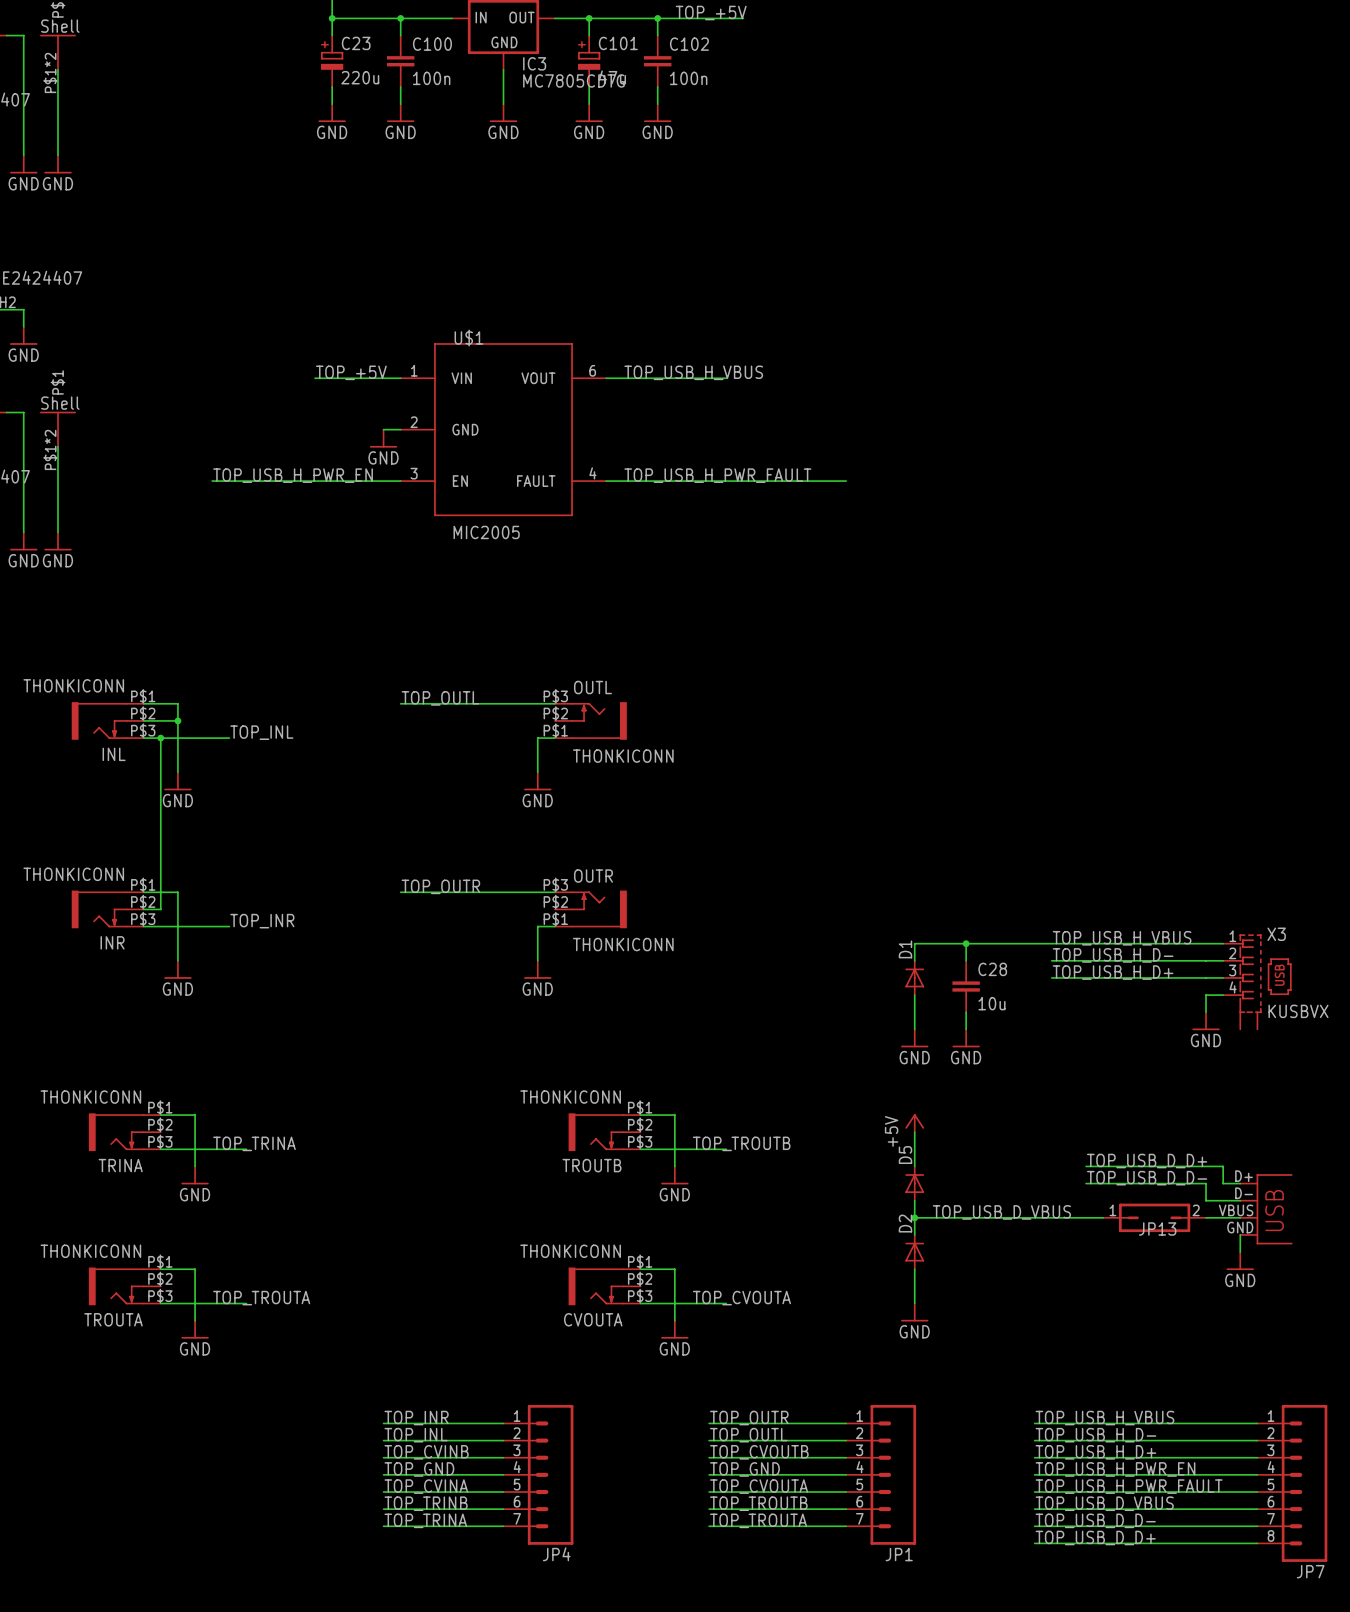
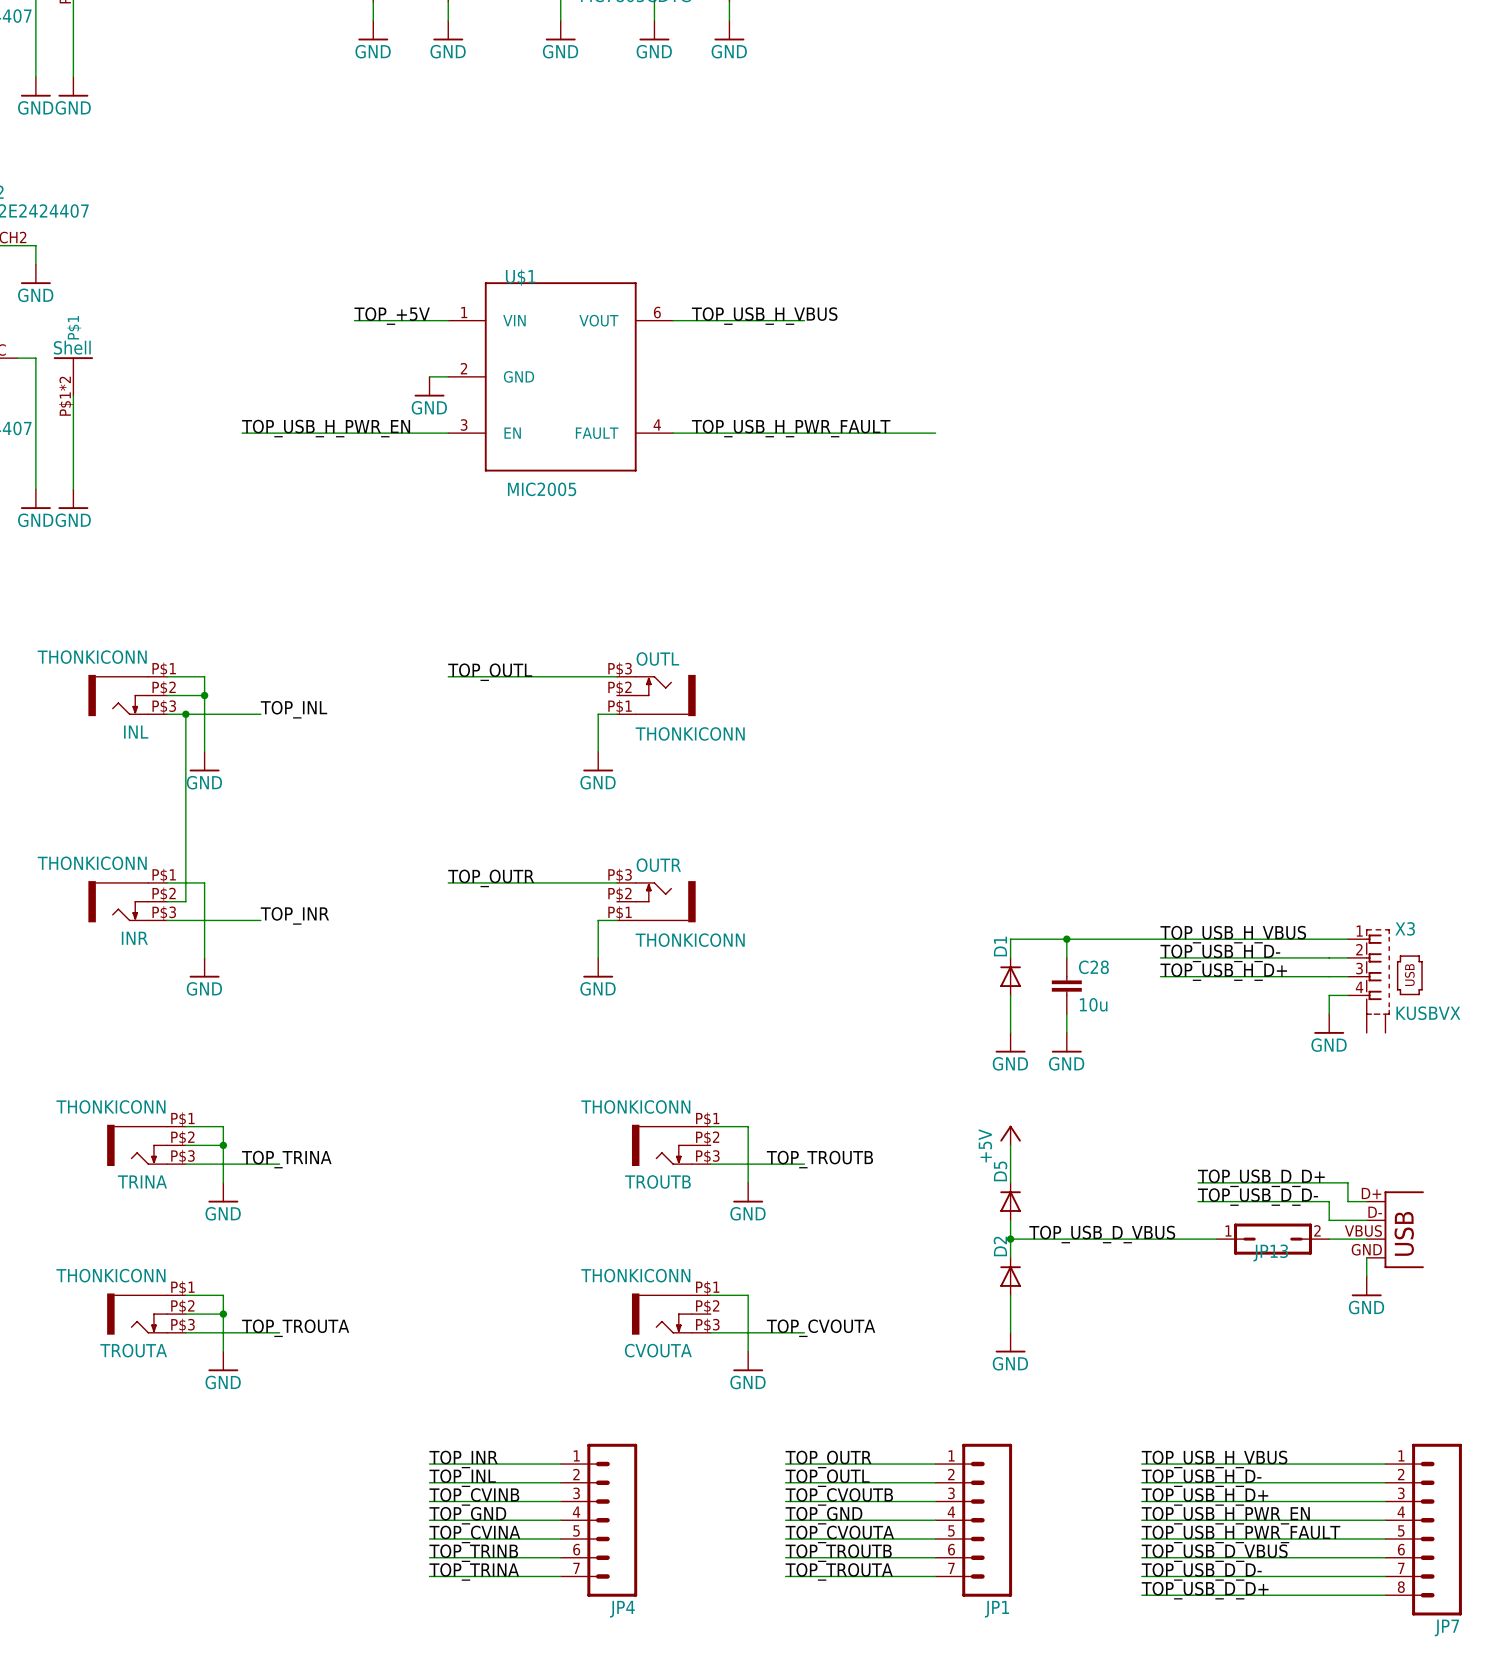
wire: none -> (185, 1145) (223, 1145)
junction: none -> (223, 1145)
wire: none -> (185, 1314) (223, 1314)
junction: none -> (223, 1314)

